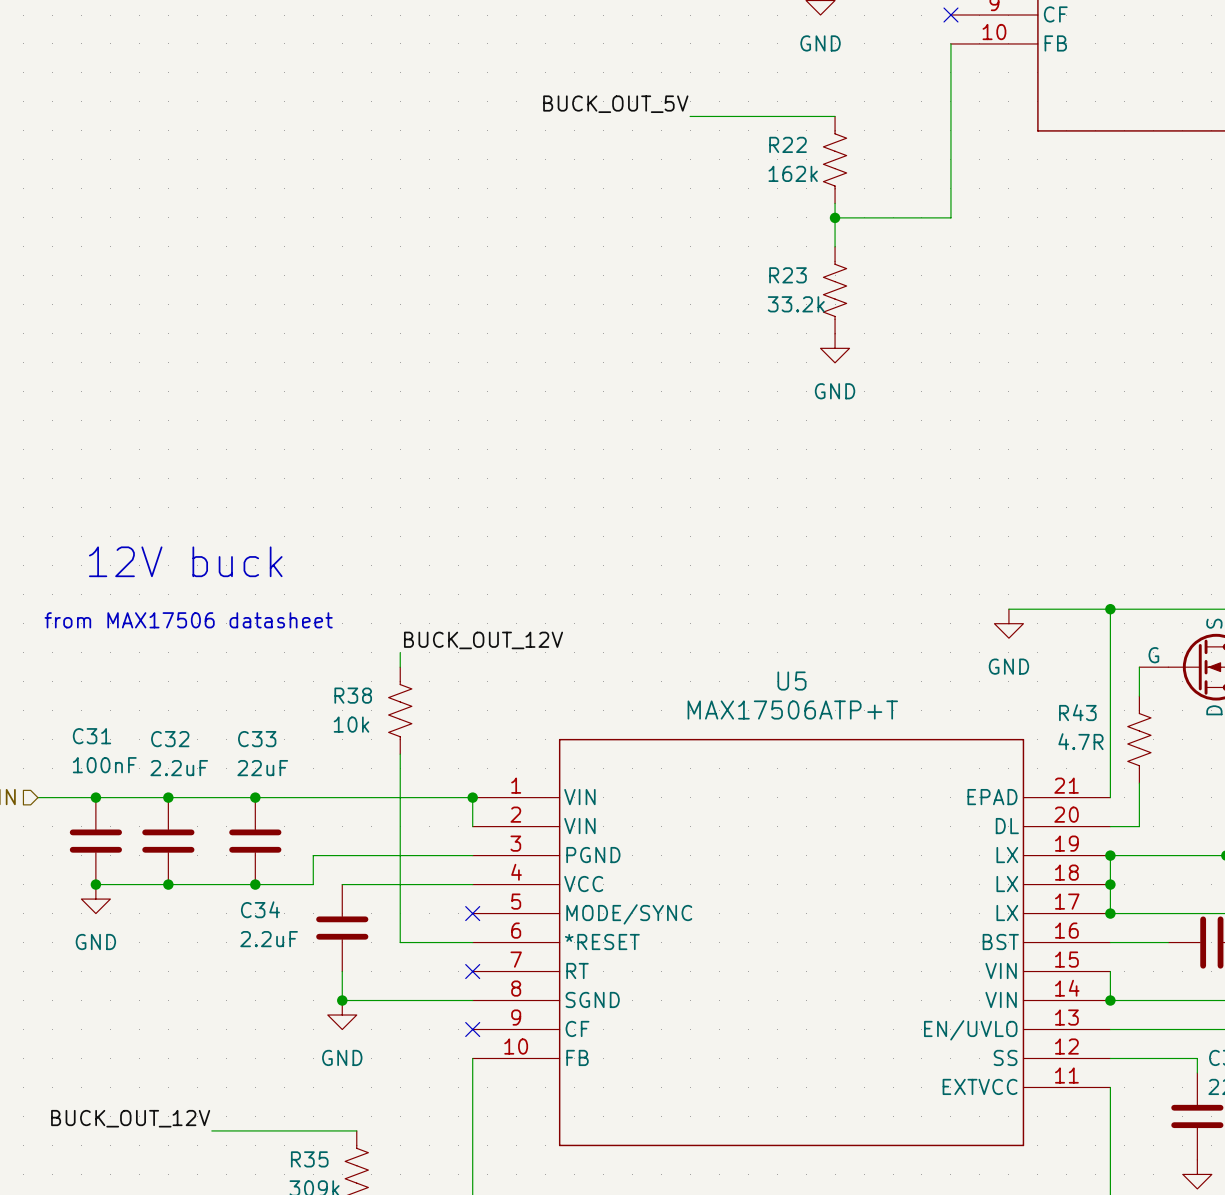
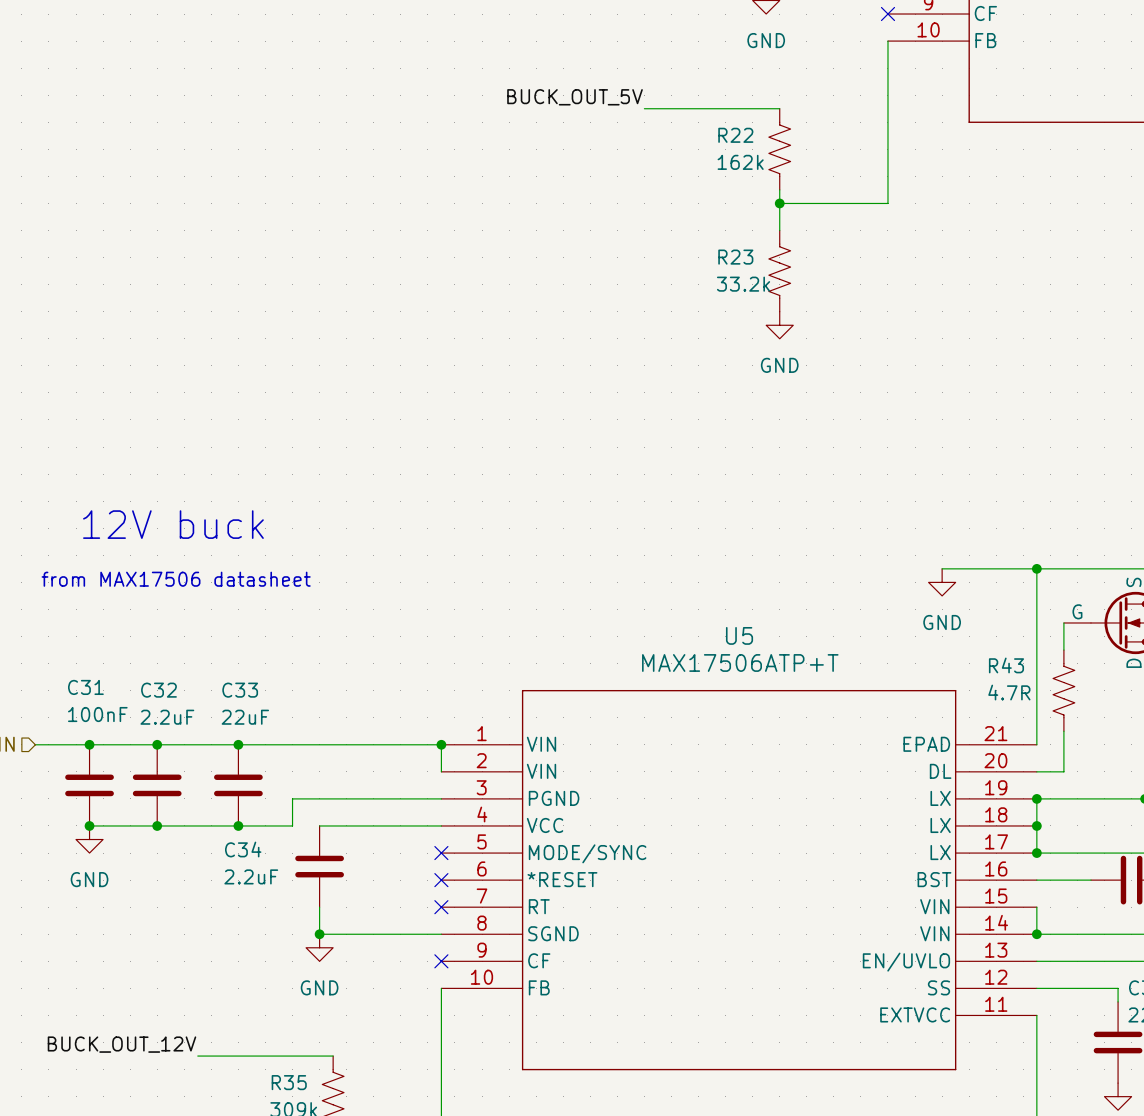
label: BUCK_OUT_12V (483, 640) -> none
wire: (400, 652) (400, 667) -> none
R38: 10k (400, 710) -> none
wire: (400, 754) (400, 942) (472, 942) -> none
no-connect mark: none -> (441, 880)

